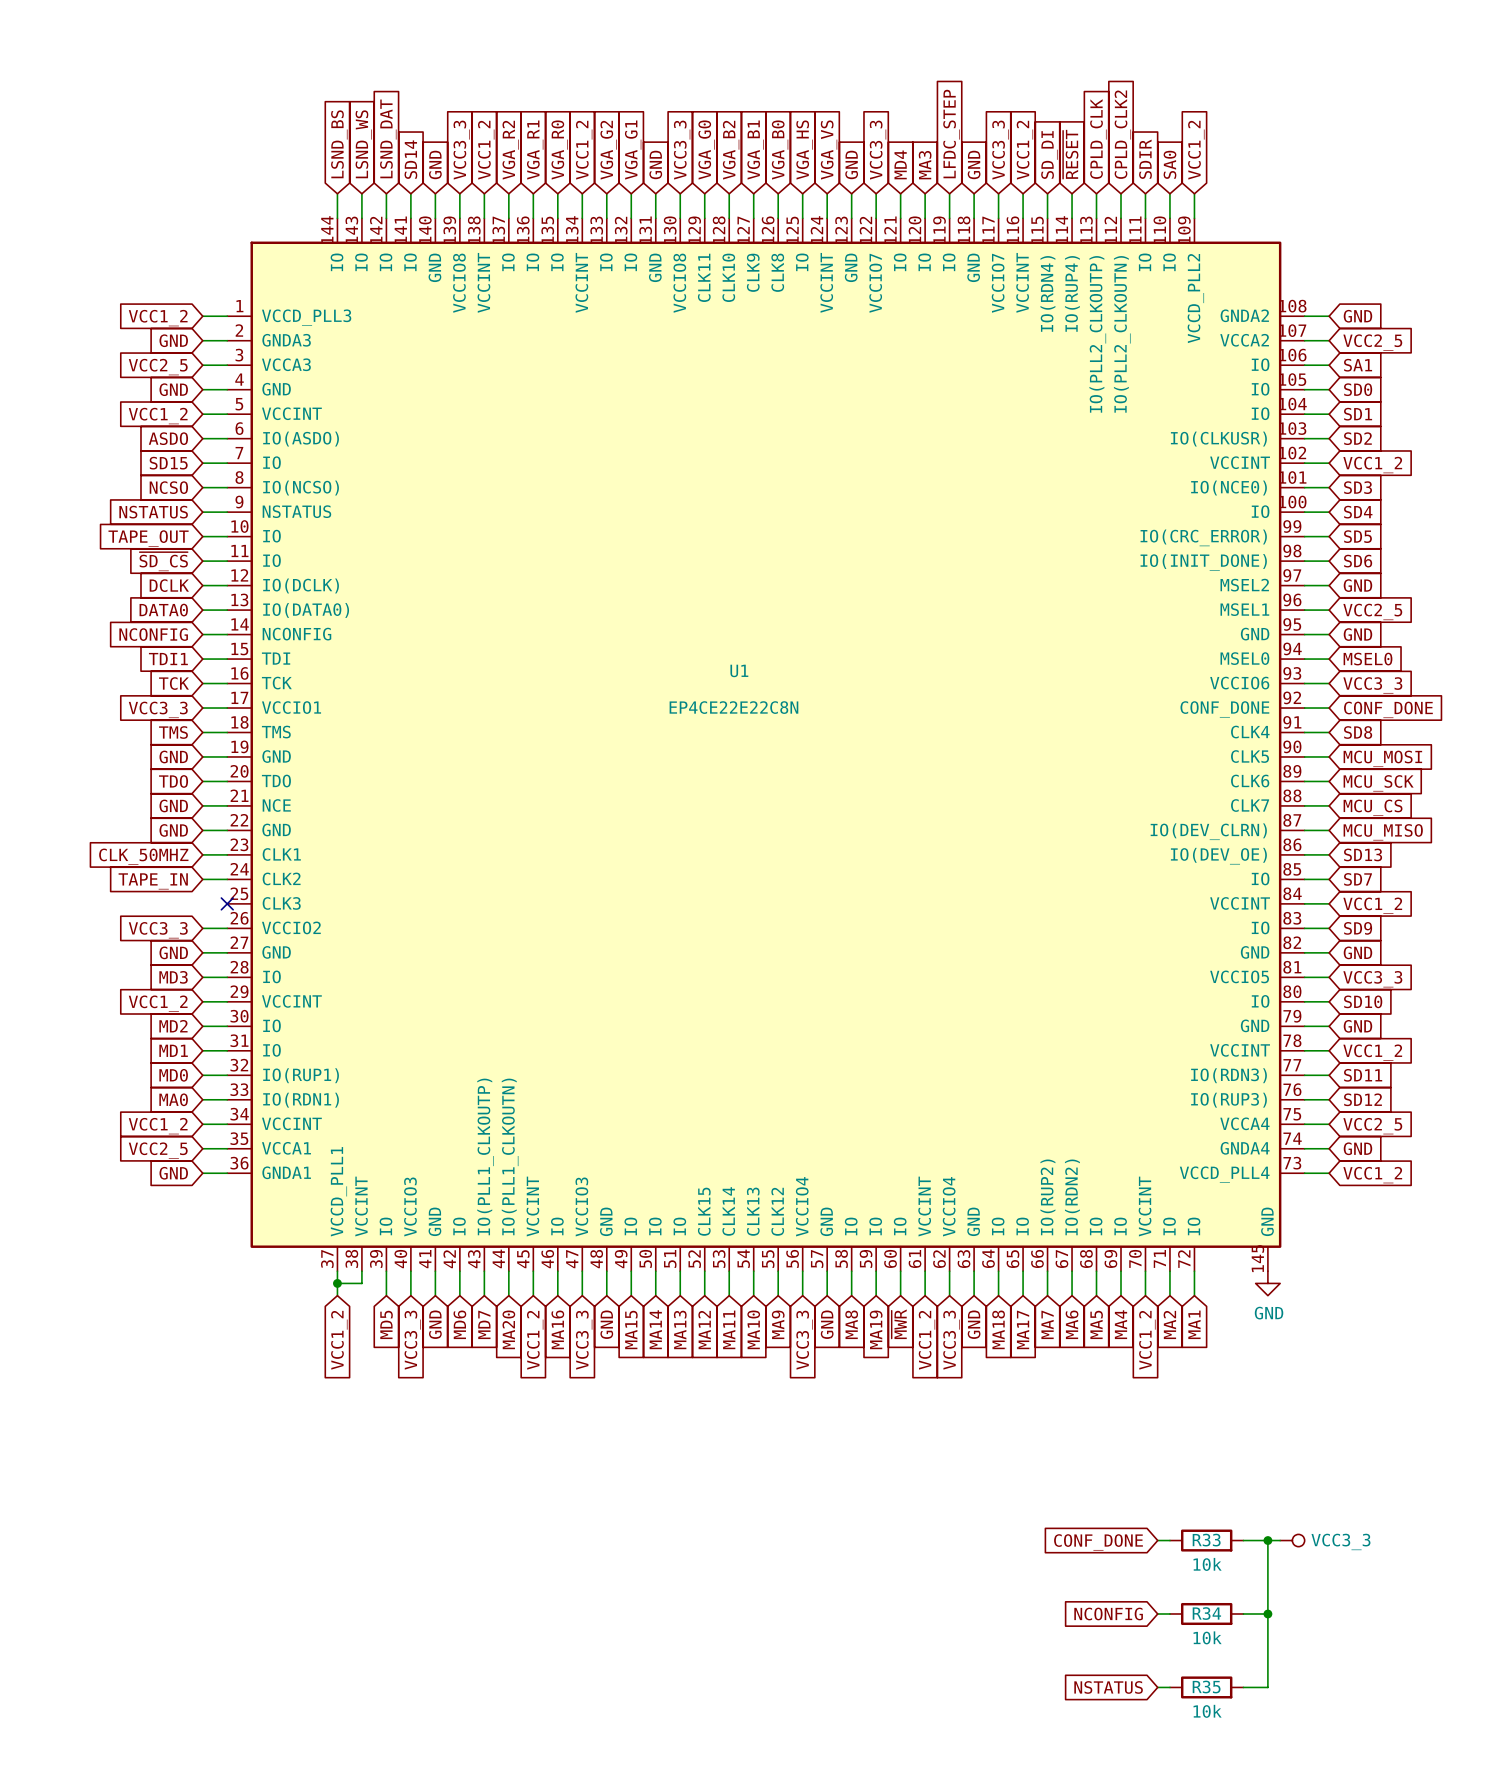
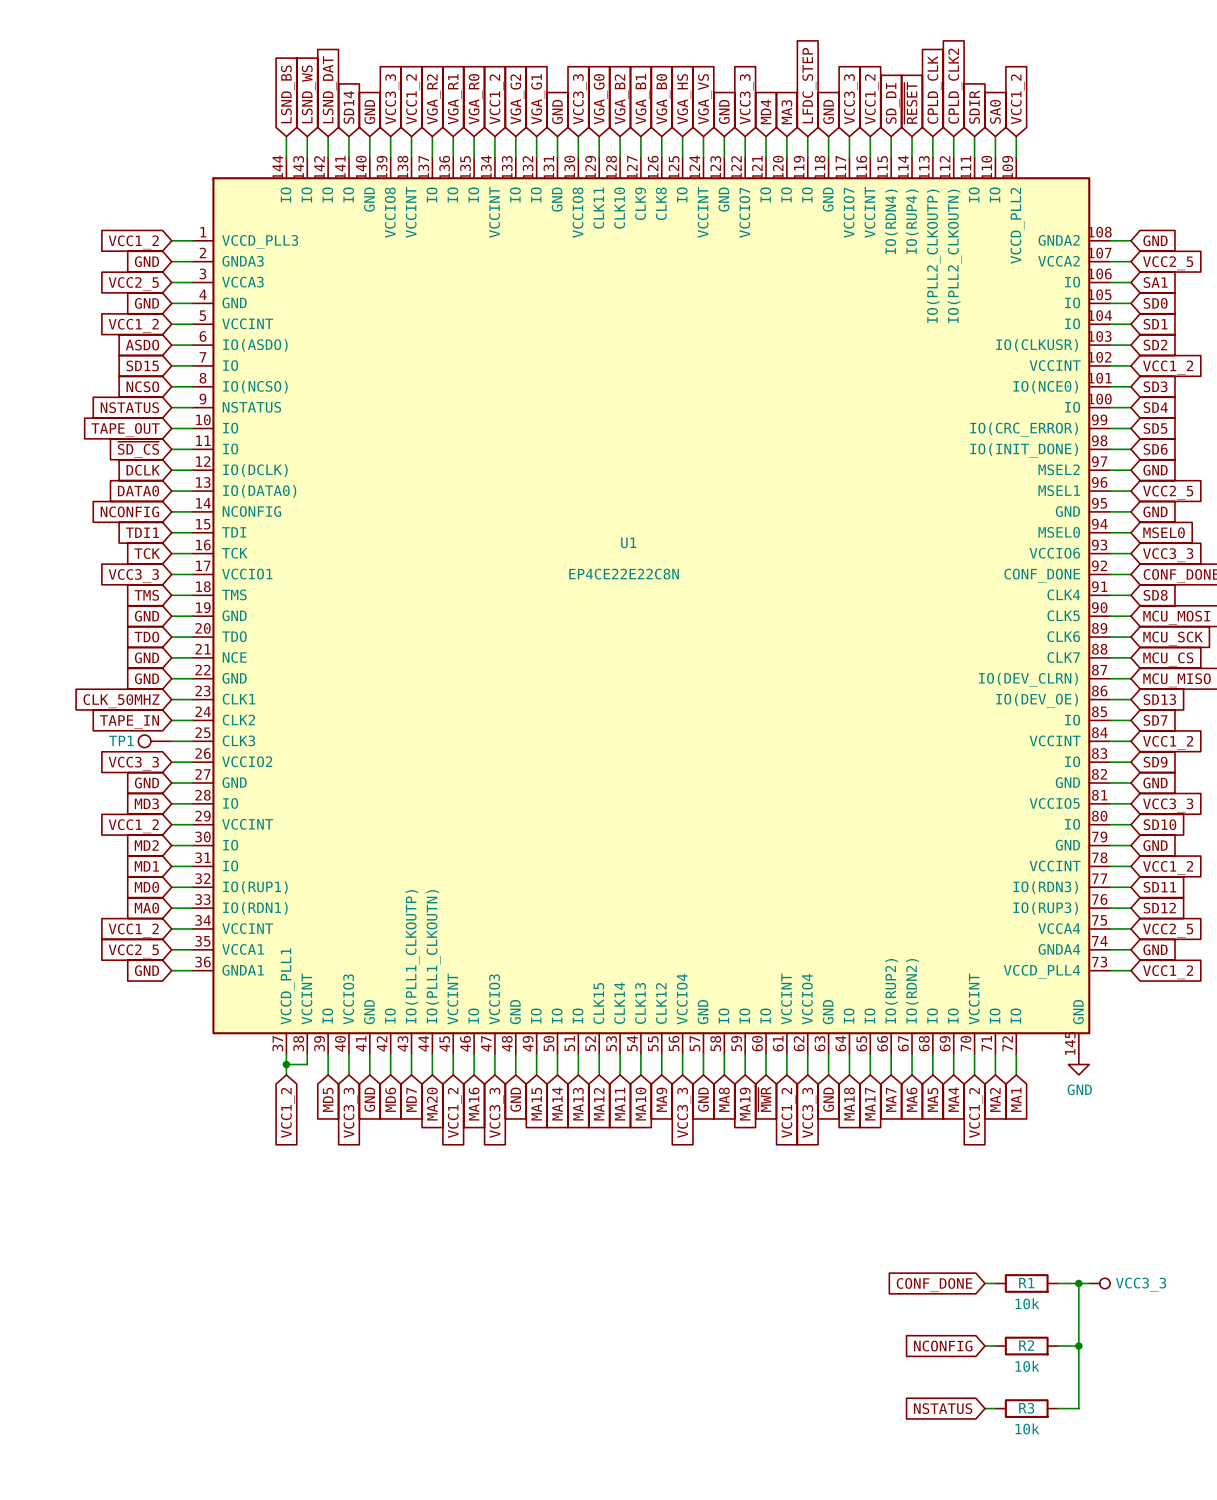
TP1: none -> (155, 741)
wire: none -> (171, 741) (192, 741)
no-connect mark: (227, 903) -> none
R33 name: R33 (1206, 1540) -> R1 (1026, 1283)
R34 name: R34 (1206, 1613) -> R2 (1026, 1345)
R35 name: R35 (1206, 1687) -> R3 (1026, 1408)

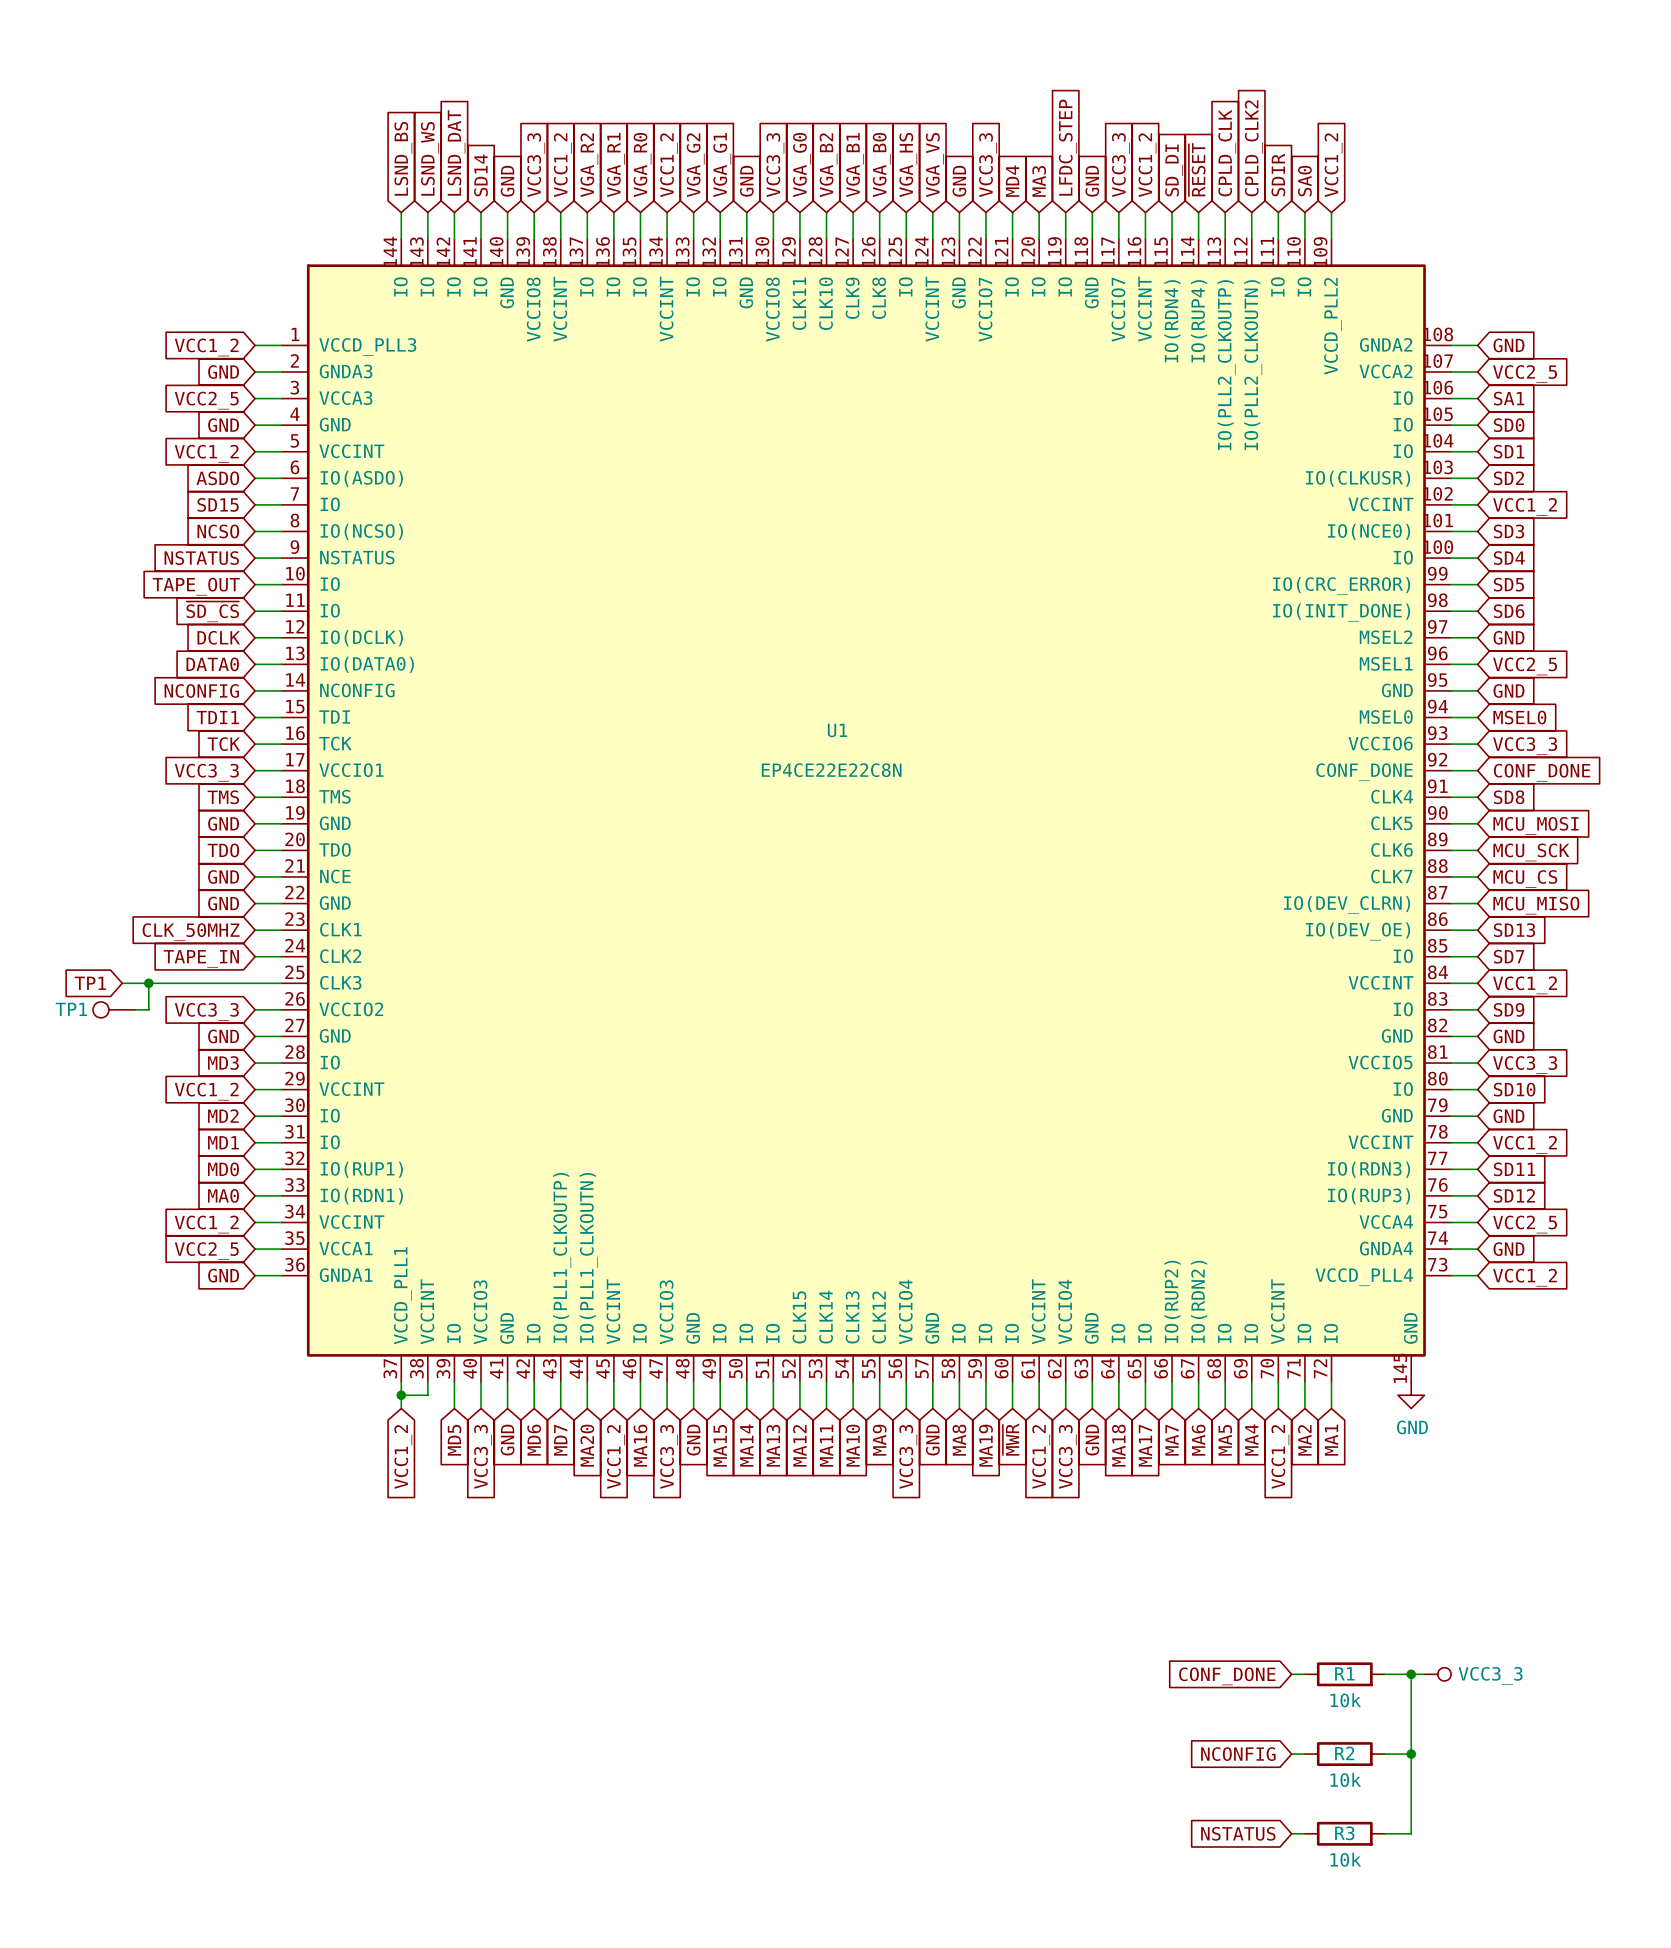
global label: none -> TP1 (90, 983)
wire: none -> (122, 983) (255, 983)
wire: none -> (148, 983) (148, 1009) (135, 1009)
junction: none -> (148, 983)
TP1 position: (155, 741) -> (114, 1009)

